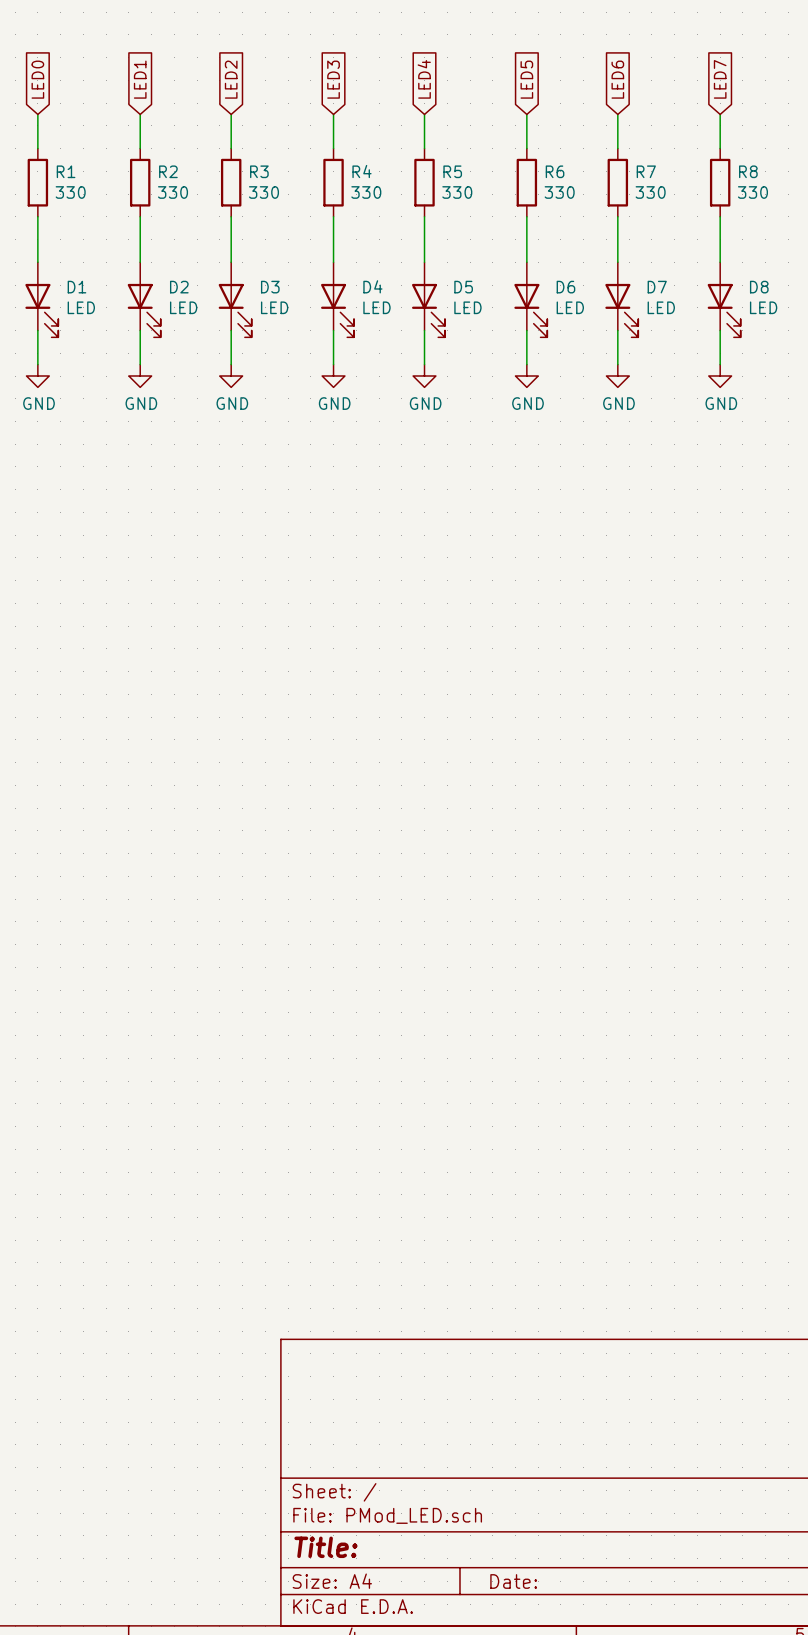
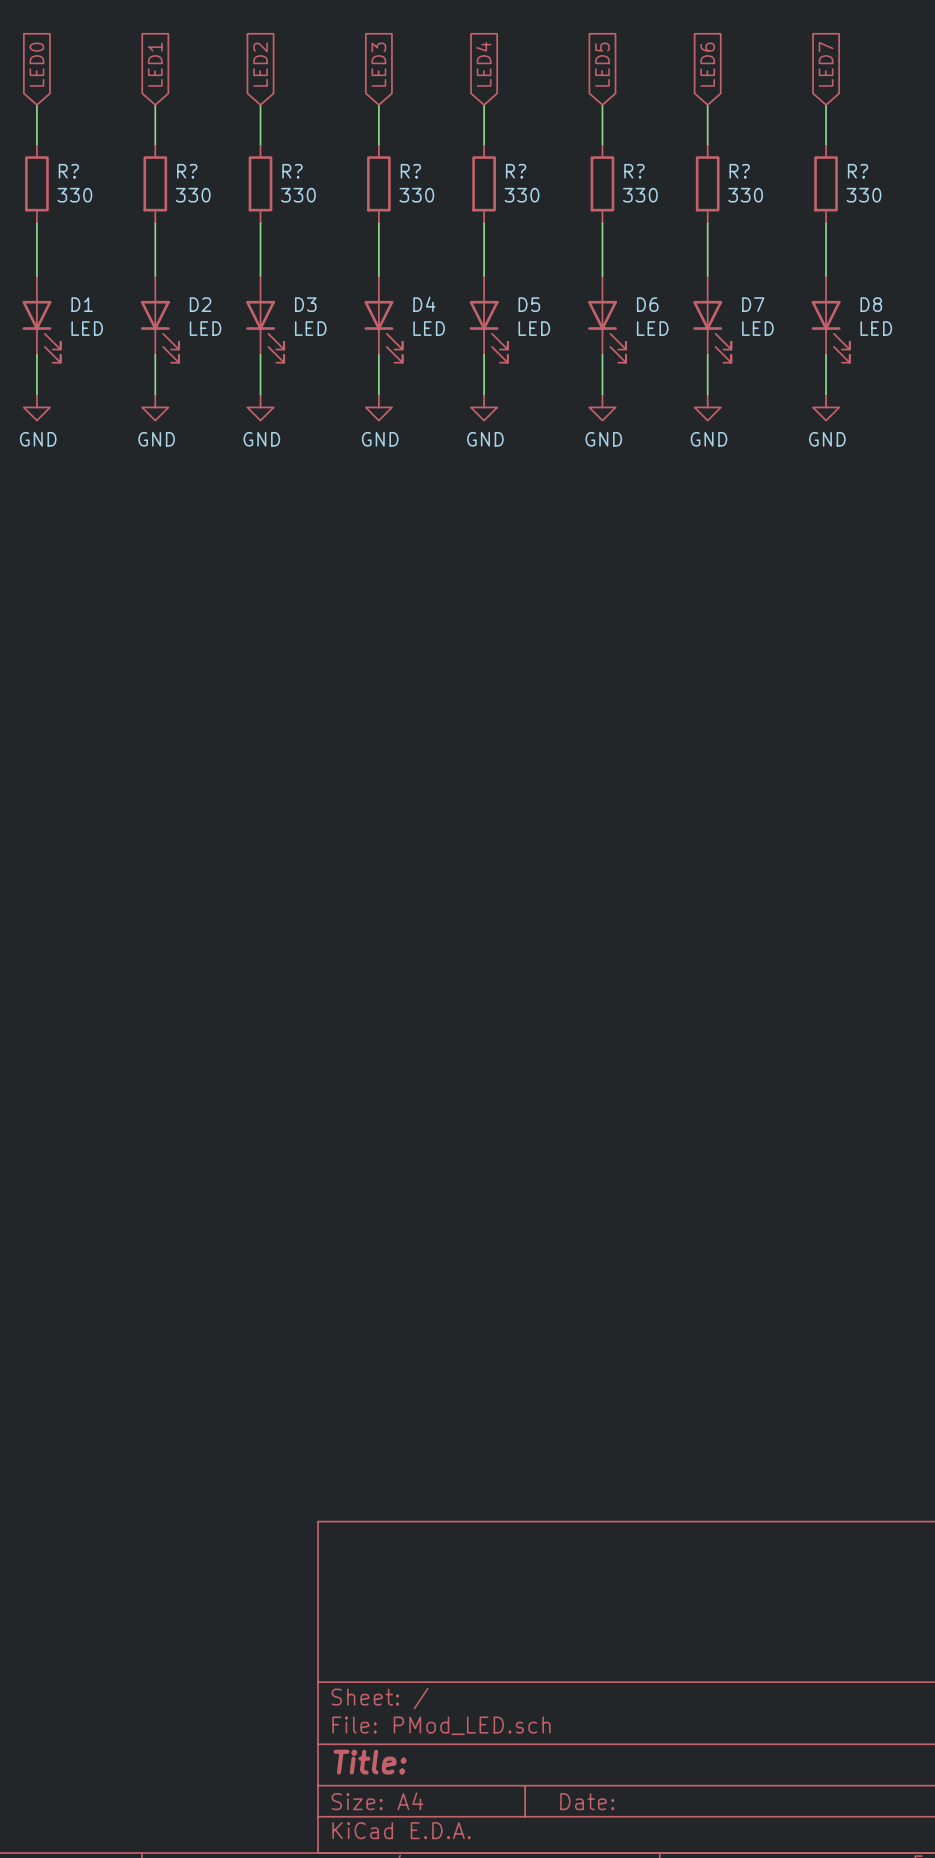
R1 name: R1 (66, 171) -> R? (68, 171)
R2 name: R2 (168, 171) -> R? (187, 171)
R3 name: R3 (259, 171) -> R? (292, 171)
R4 name: R4 (362, 171) -> R? (410, 171)
R5 name: R5 (452, 171) -> R? (516, 171)
R6 name: R6 (555, 171) -> R? (634, 171)
R7 name: R7 (646, 171) -> R? (739, 171)
R8 name: R8 (748, 171) -> R? (858, 171)

